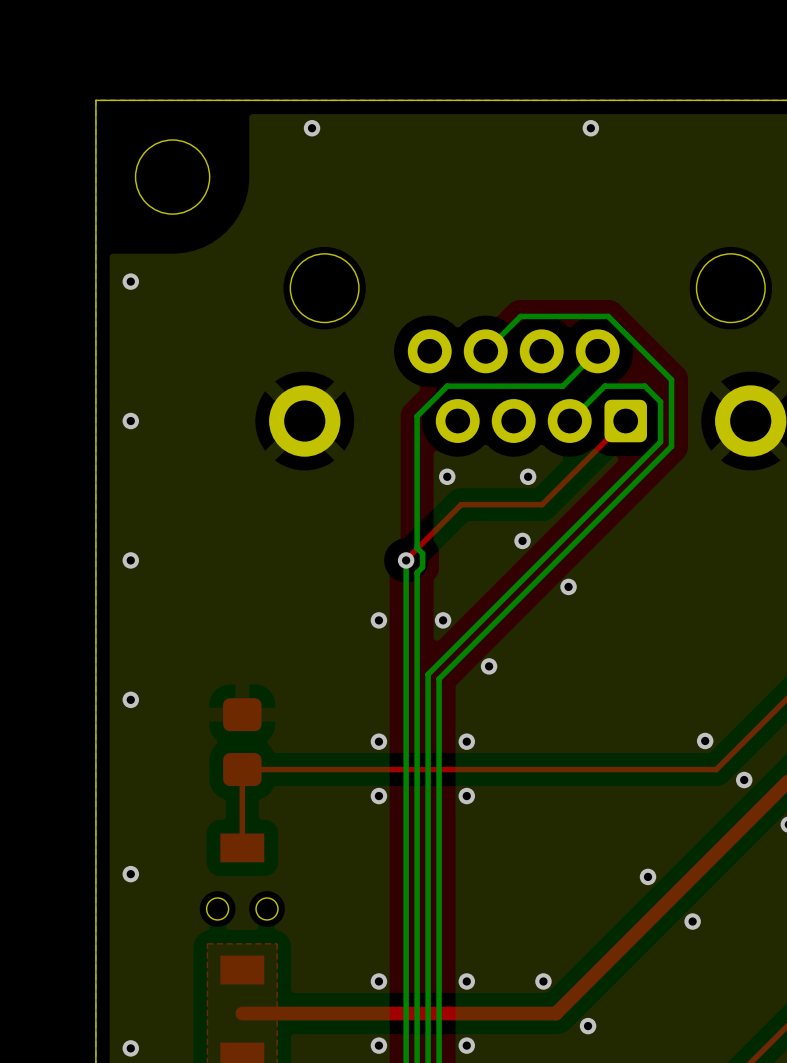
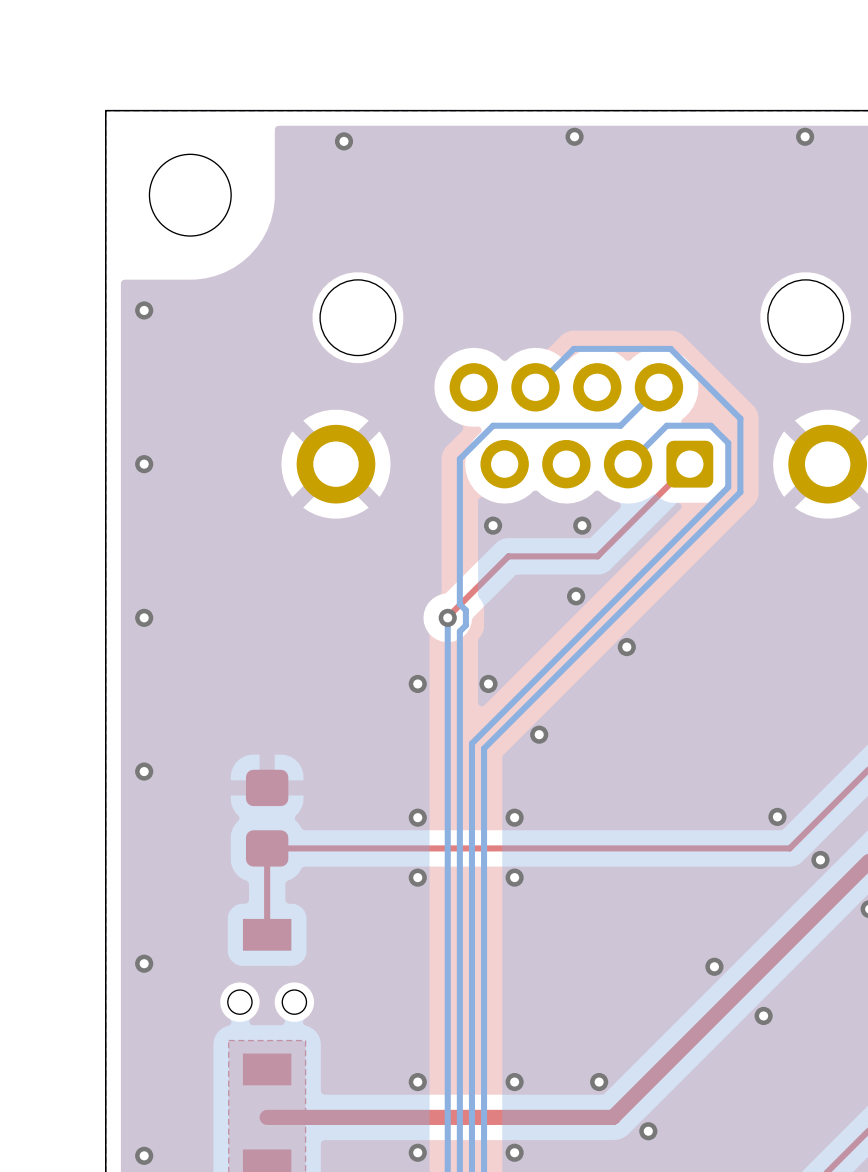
via: none -> (574, 136)
via: none -> (805, 136)
via: (590, 128) -> none

